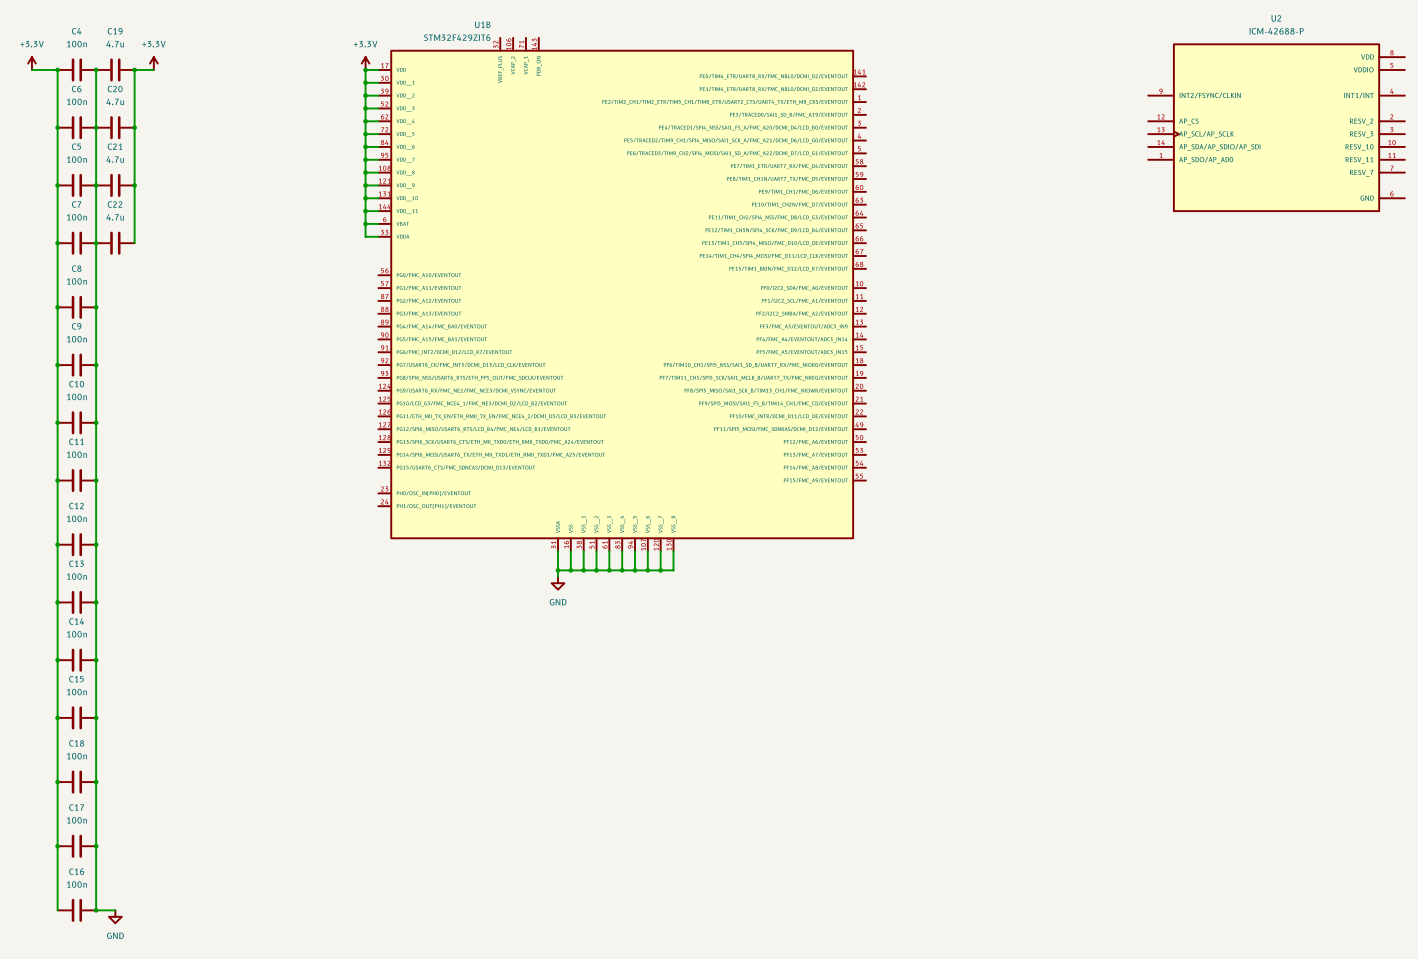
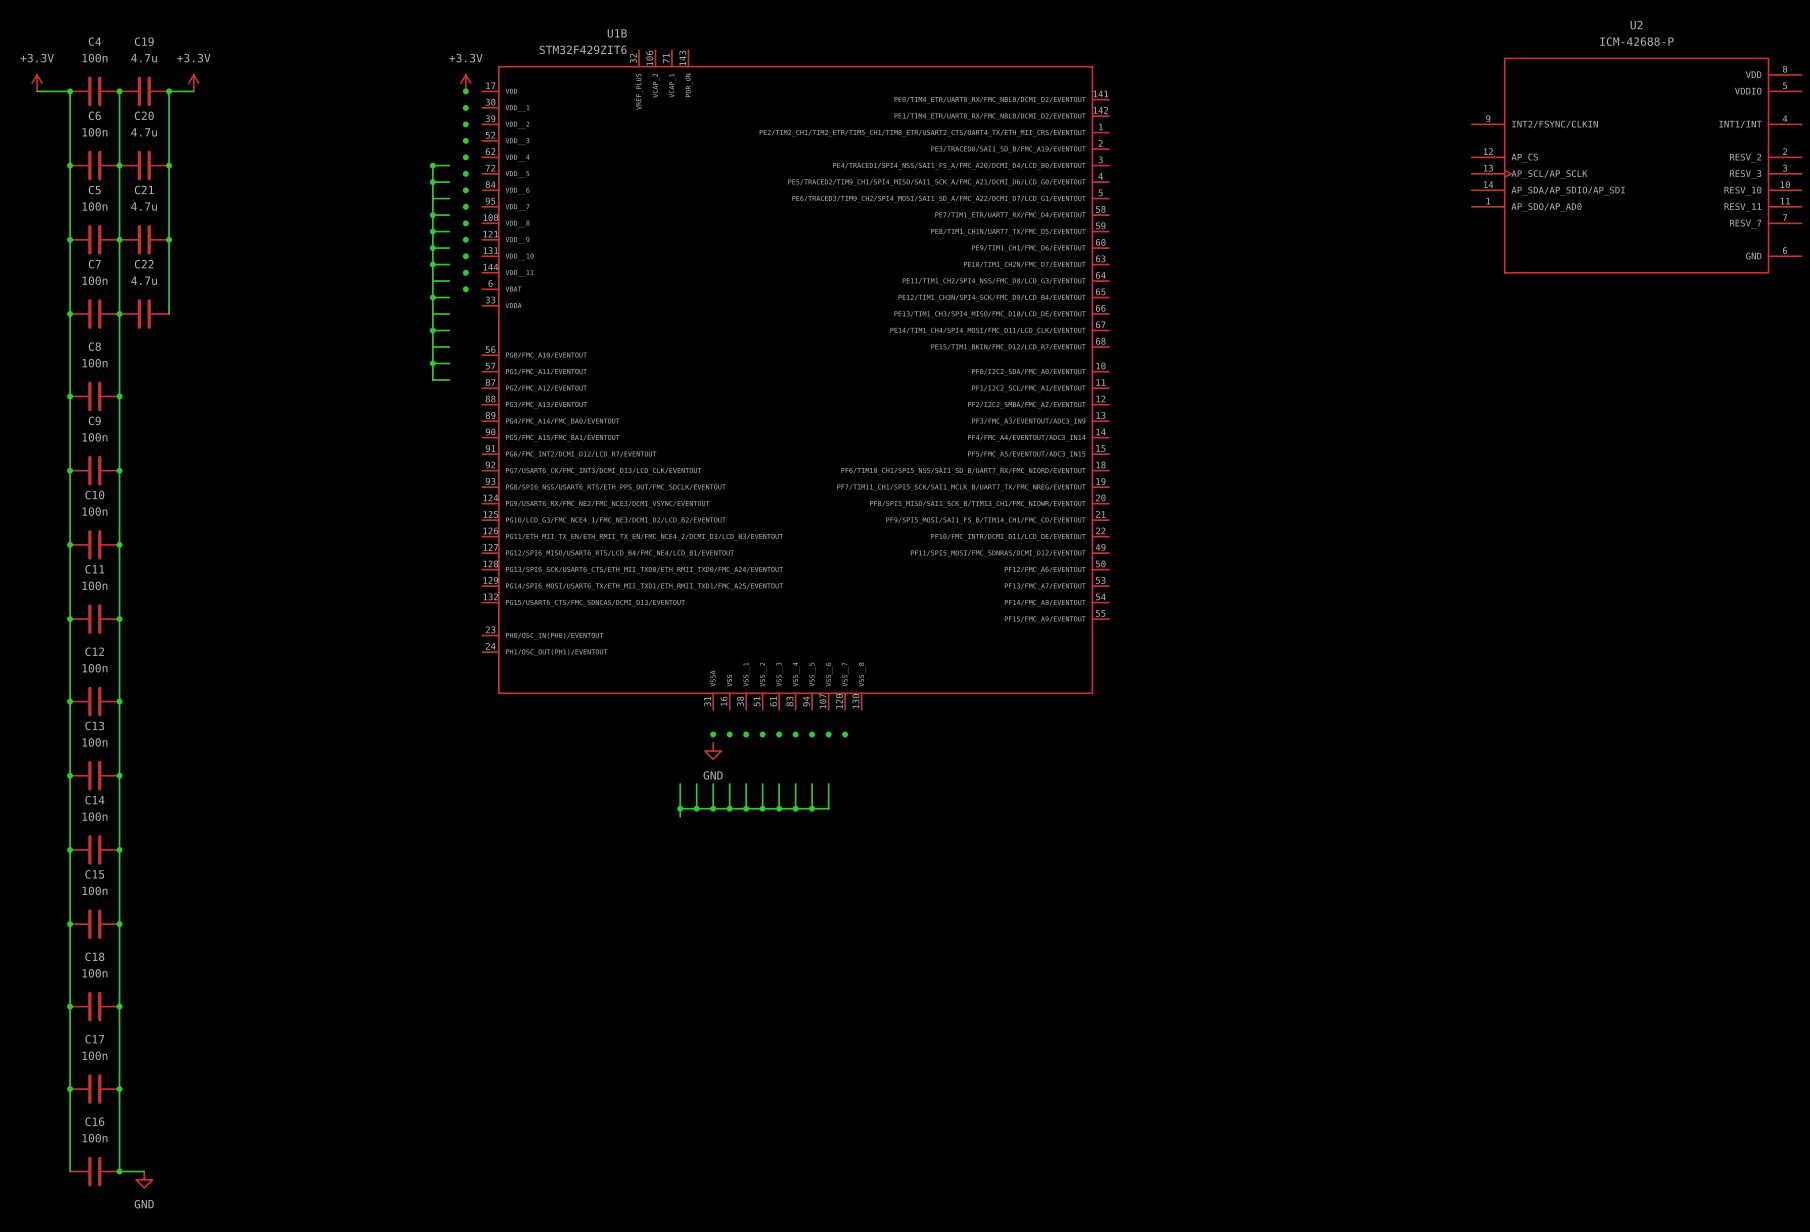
wire: (378, 69) (365, 69) (365, 236) (378, 236) -> (449, 165) (432, 165) (432, 379) (449, 379)
wire: (365, 82) (378, 82) -> (432, 182) (449, 182)
wire: (365, 95) (378, 95) -> (432, 198) (449, 198)
wire: (365, 108) (378, 108) -> (432, 215) (449, 215)
wire: (365, 121) (378, 121) -> (432, 231) (449, 231)
junction: none -> (432, 165)
wire: (365, 134) (378, 134) -> (432, 248) (449, 248)
junction: none -> (432, 182)
wire: (365, 146) (378, 146) -> (432, 264) (449, 264)
wire: (365, 159) (378, 159) -> (432, 281) (449, 281)
junction: none -> (432, 215)
wire: (365, 172) (378, 172) -> (432, 297) (449, 297)
junction: none -> (432, 231)
wire: (365, 185) (378, 185) -> (432, 314) (449, 314)
junction: none -> (432, 248)
wire: (365, 198) (378, 198) -> (432, 330) (449, 330)
junction: none -> (432, 264)
wire: (365, 211) (378, 211) -> (432, 346) (449, 346)
wire: (365, 223) (378, 223) -> (432, 363) (449, 363)
junction: none -> (432, 297)
junction: none -> (432, 330)
junction: none -> (432, 363)
wire: (558, 551) (558, 576) -> (680, 783) (680, 816)
wire: (570, 551) (570, 570) -> (696, 783) (696, 808)
wire: (583, 551) (583, 570) -> (713, 783) (713, 808)
wire: (596, 551) (596, 570) -> (729, 783) (729, 808)
wire: (609, 551) (609, 570) -> (746, 783) (746, 808)
wire: (622, 551) (622, 570) -> (762, 783) (762, 808)
wire: (635, 551) (635, 570) -> (779, 783) (779, 808)
wire: (647, 551) (647, 570) -> (795, 783) (795, 808)
wire: (660, 551) (660, 570) -> (812, 783) (812, 808)
wire: (673, 551) (673, 570) (558, 570) -> (828, 783) (828, 808) (680, 808)
junction: none -> (680, 808)
junction: none -> (696, 808)
junction: none -> (713, 808)
junction: none -> (729, 808)
junction: none -> (746, 808)
junction: none -> (762, 808)
junction: none -> (779, 808)
junction: none -> (795, 808)
junction: none -> (812, 808)

